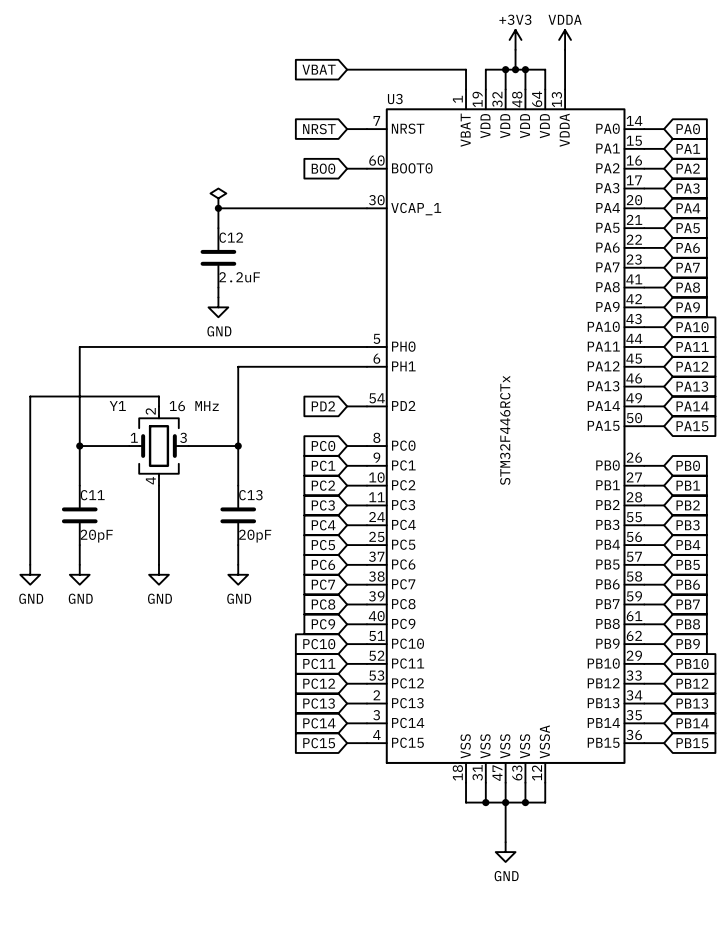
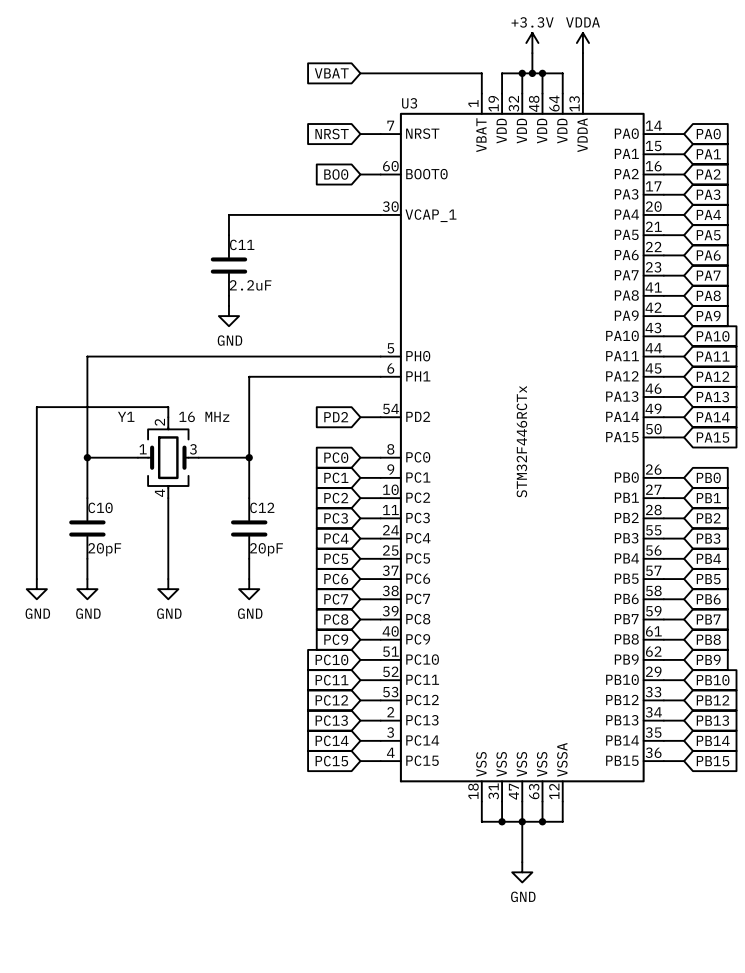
power symbol: +3V3 (515, 39) -> +3.3V (532, 43)
power symbol: (218, 198) -> none
junction: (218, 208) -> none
C12 name: C12 (231, 237) -> C11 (242, 244)
C11 name: C11 (92, 495) -> C10 (100, 507)
C13 name: C13 (250, 495) -> C12 (262, 507)

